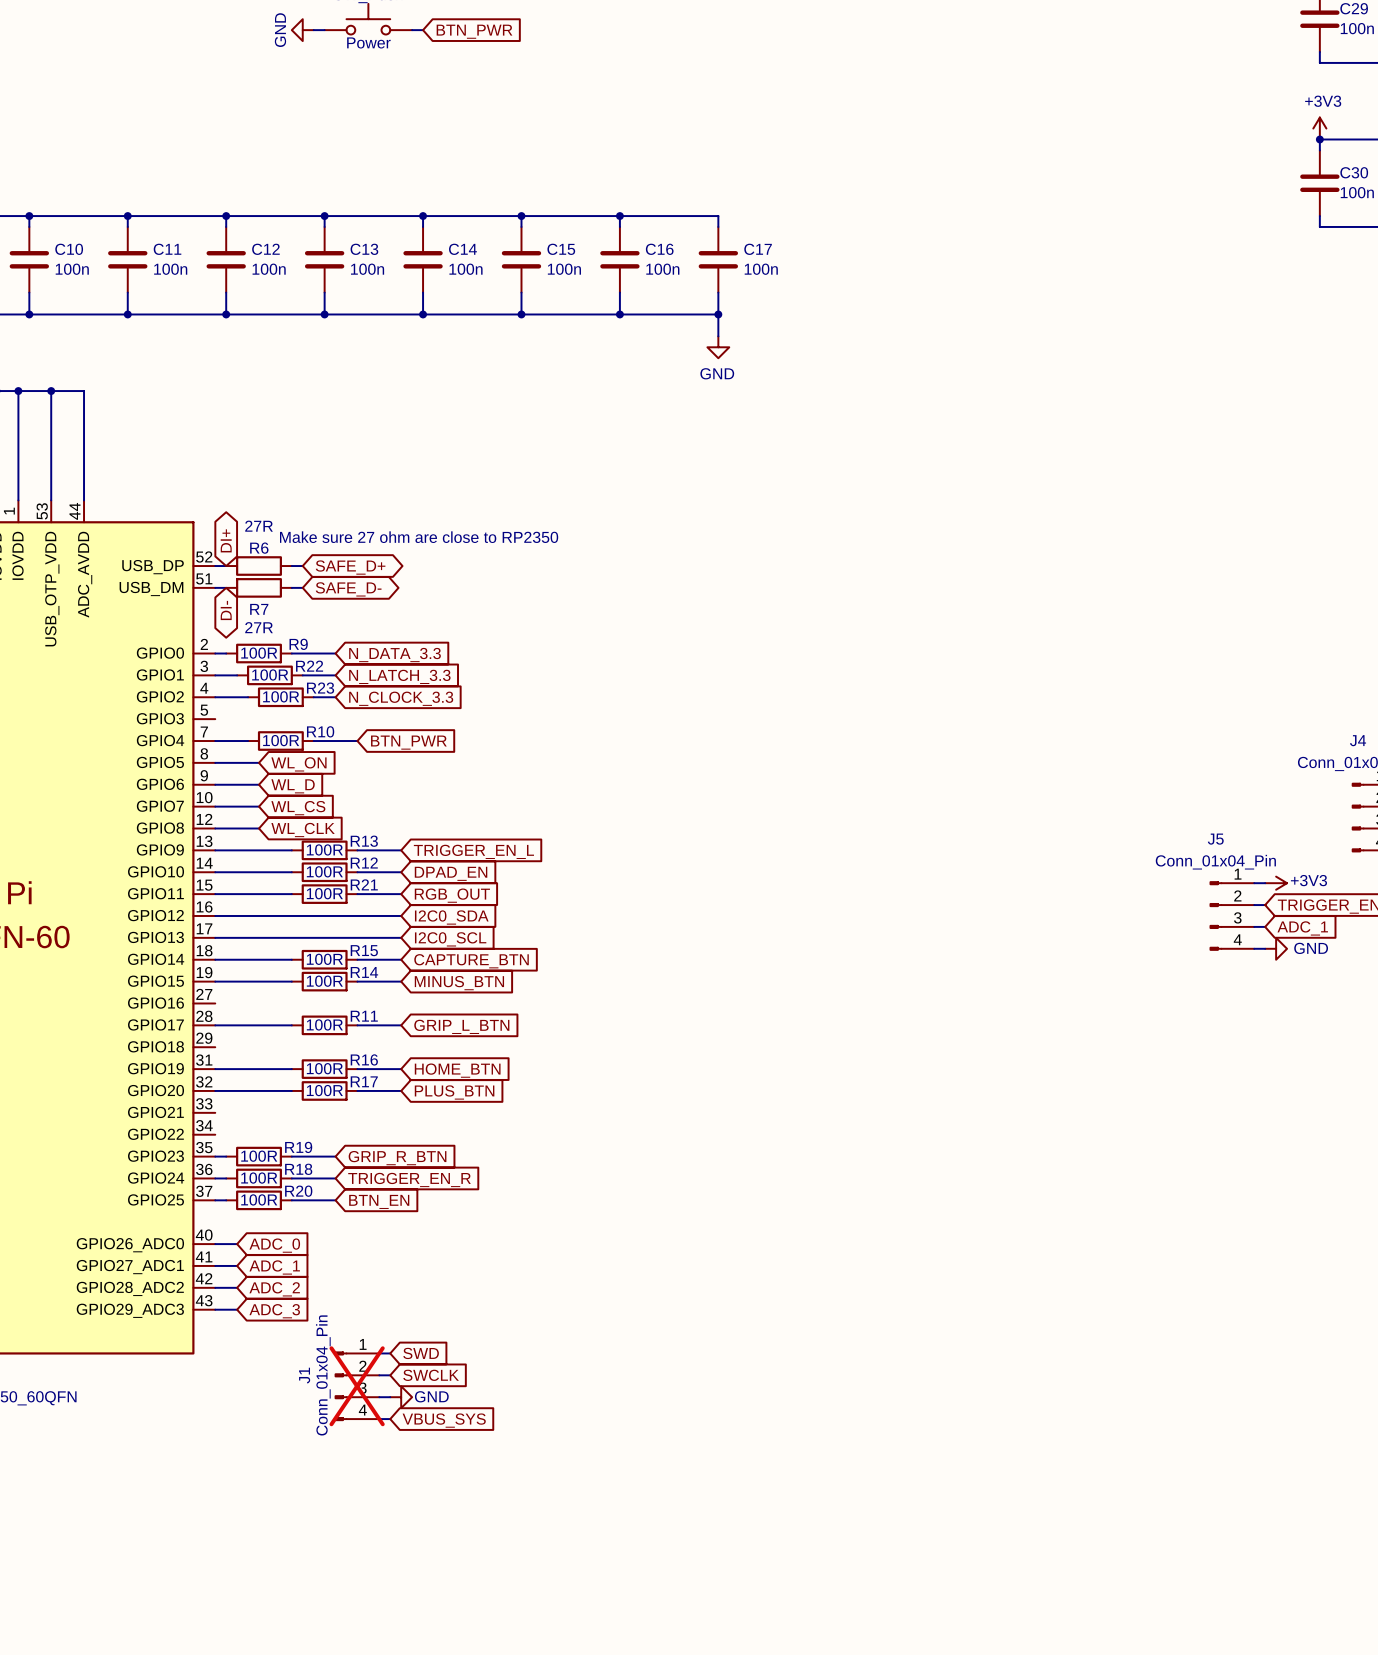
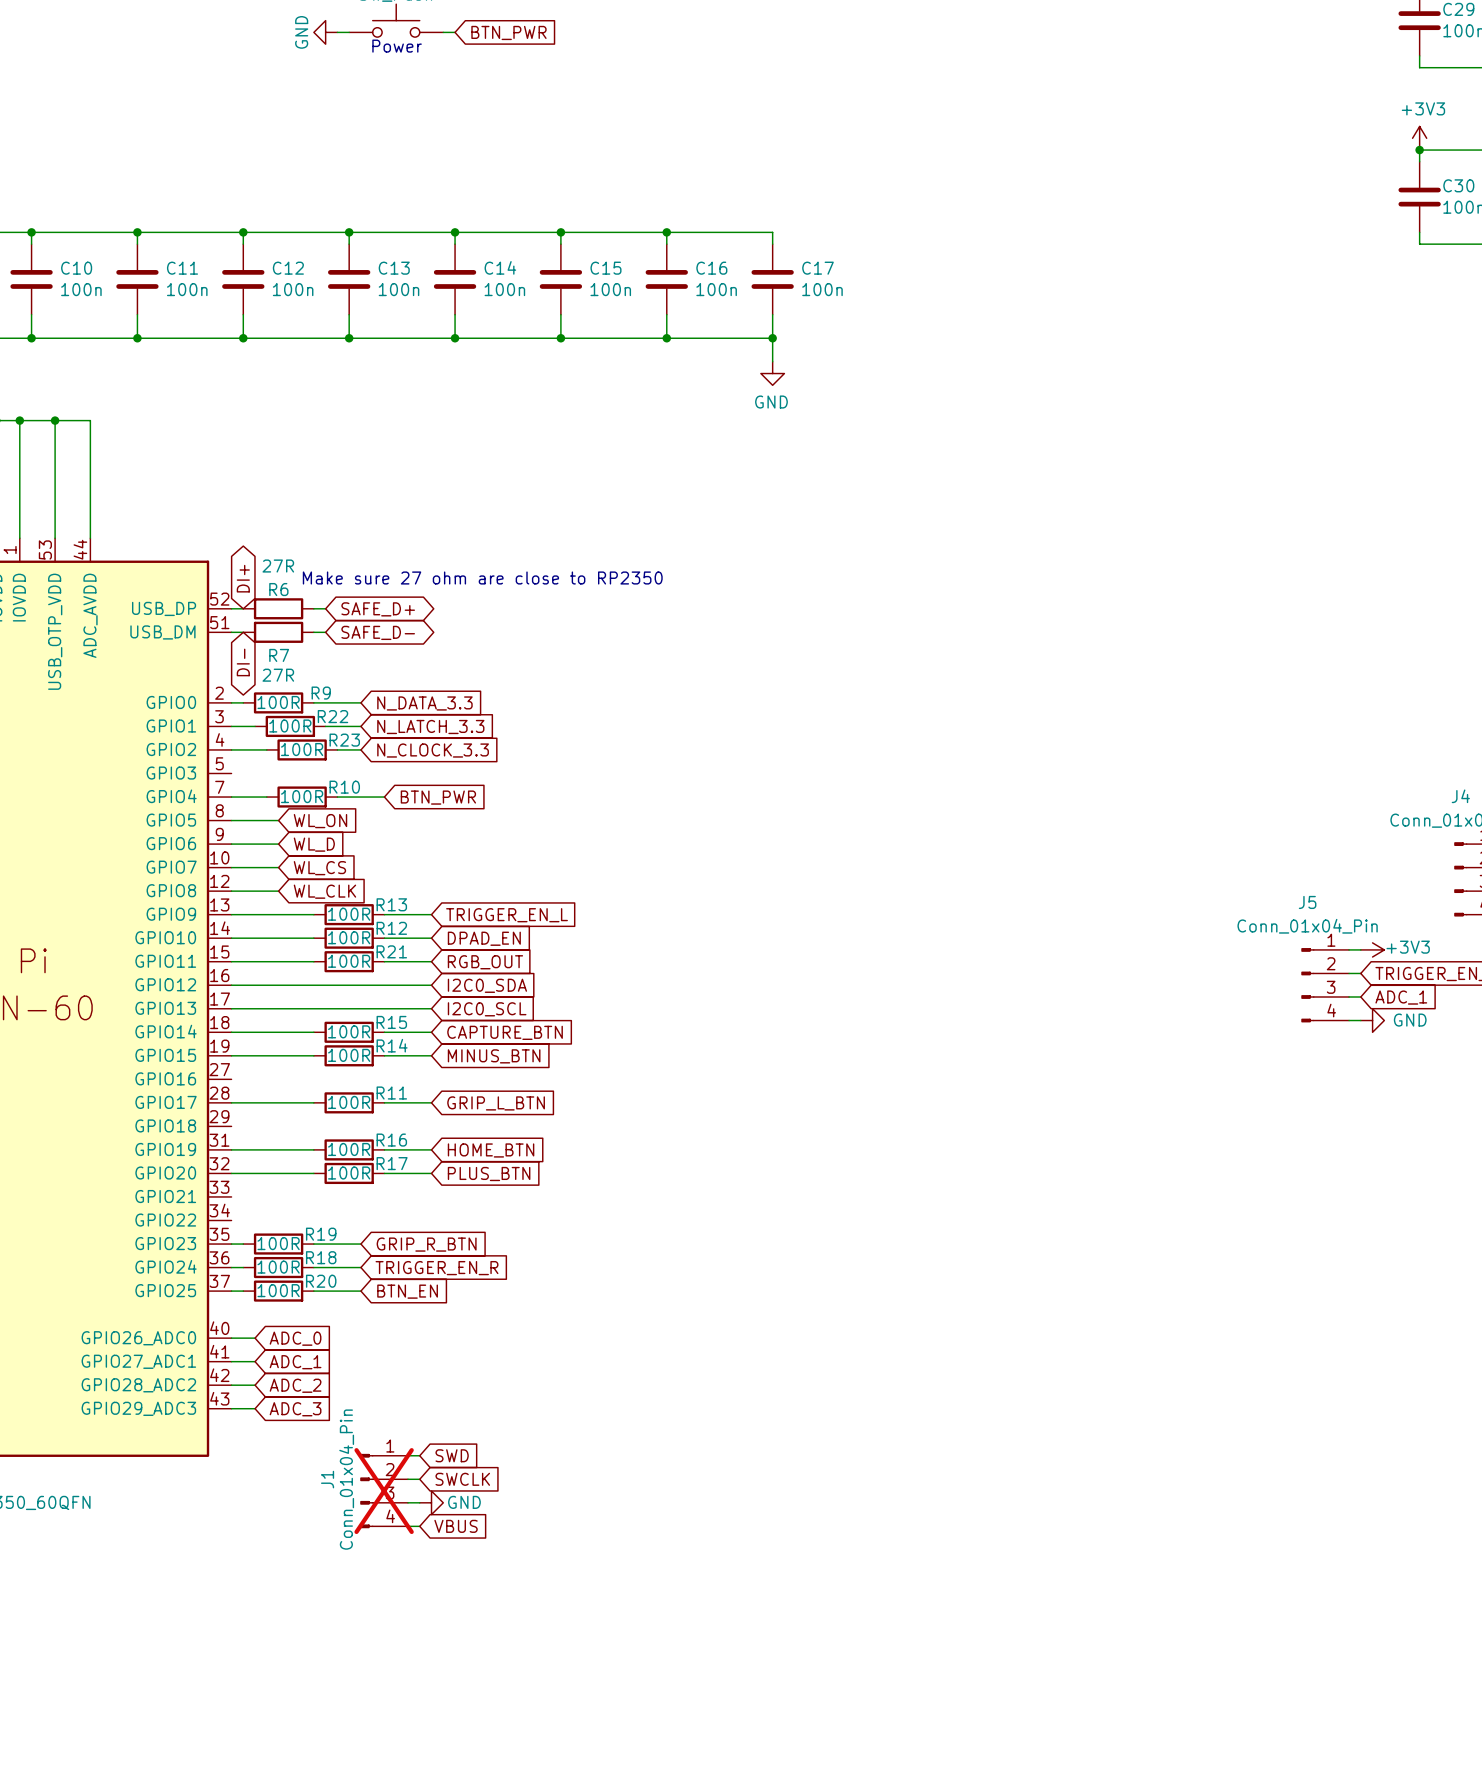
global label: VBUS_SYS (444, 1420) -> VBUS (456, 1526)

